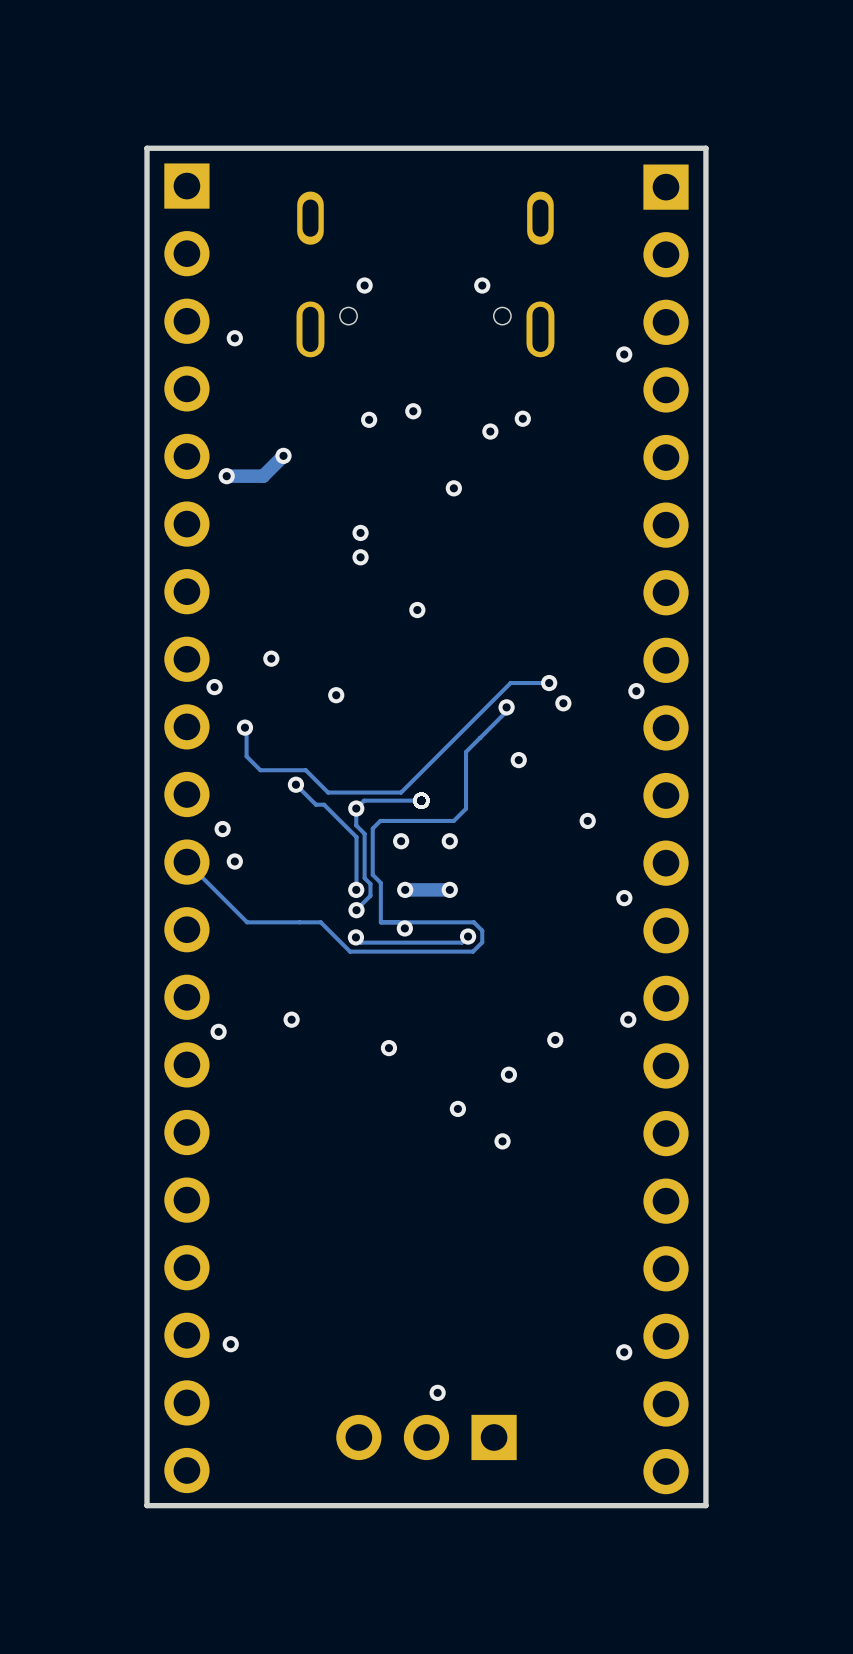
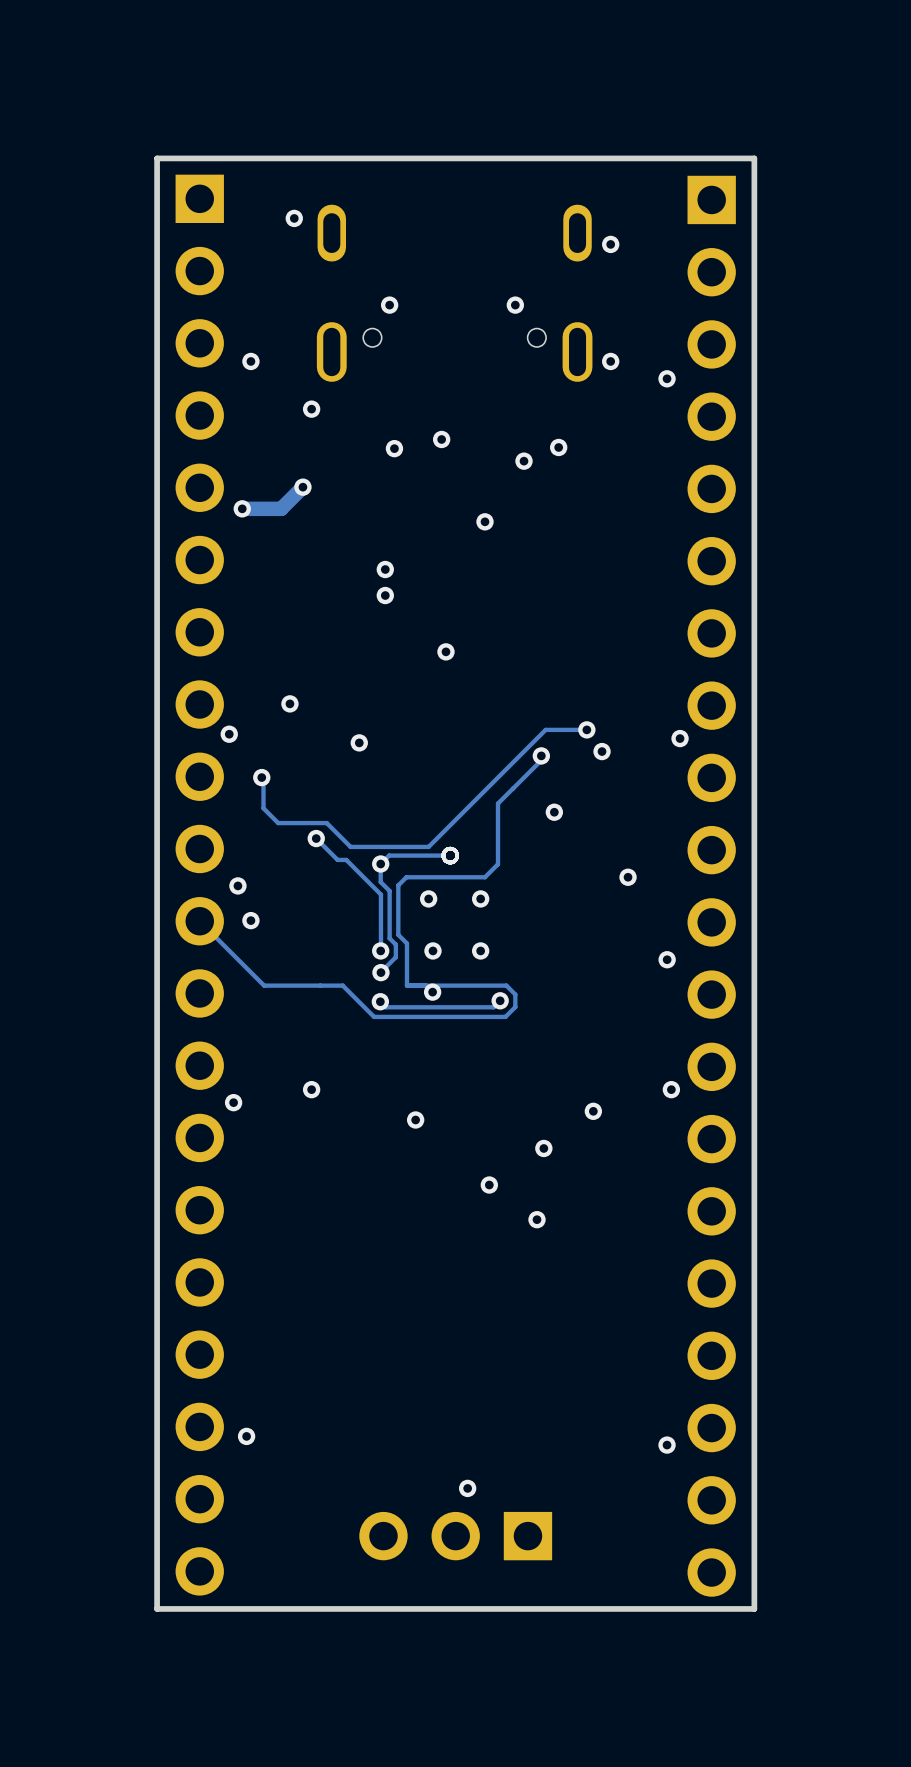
via: none -> (294, 218)
via: none -> (610, 244)
via: none -> (610, 361)
via: none -> (311, 409)
track: (449, 889) (405, 889) -> none

